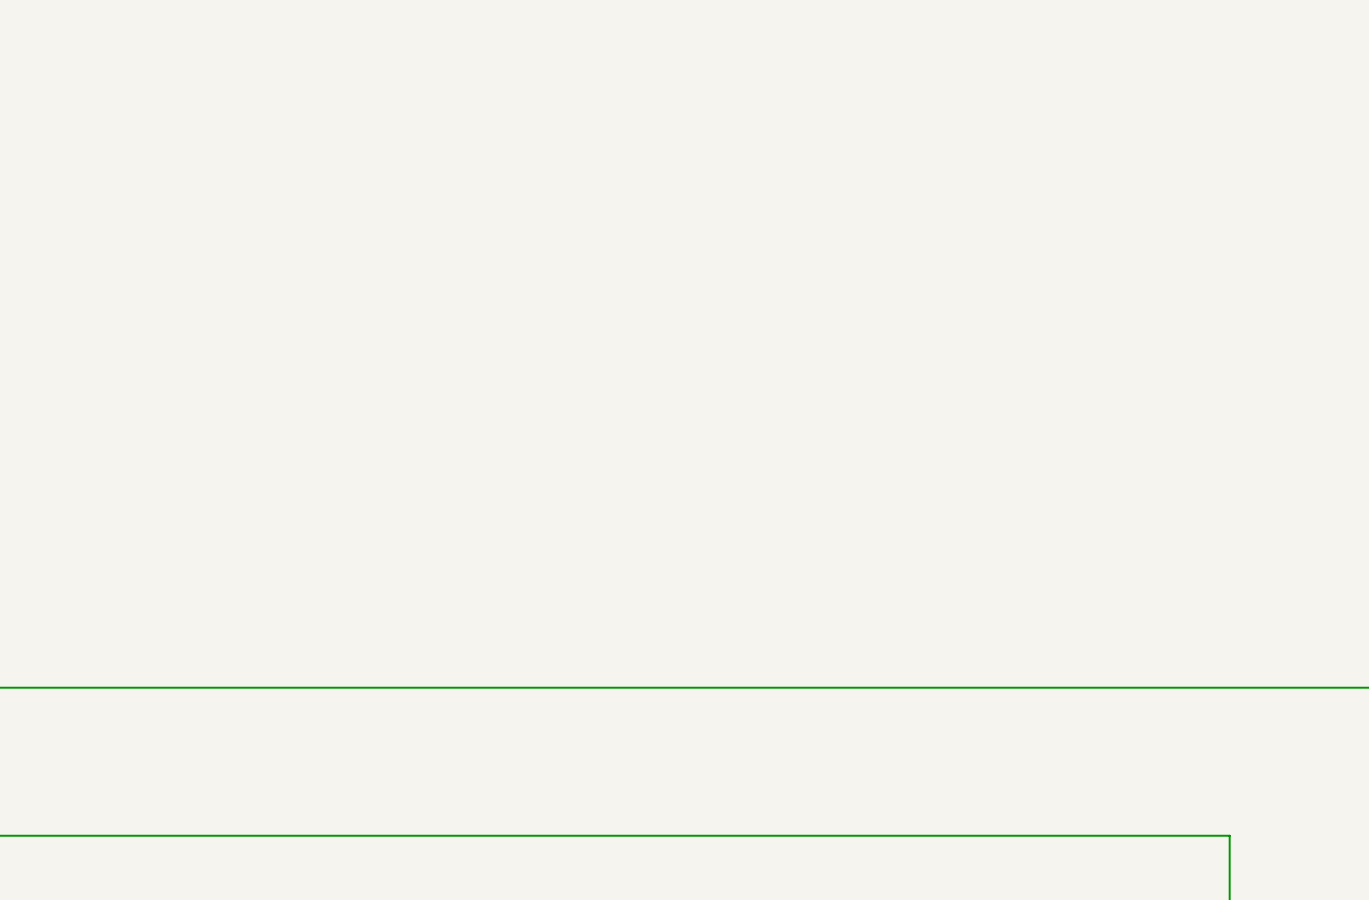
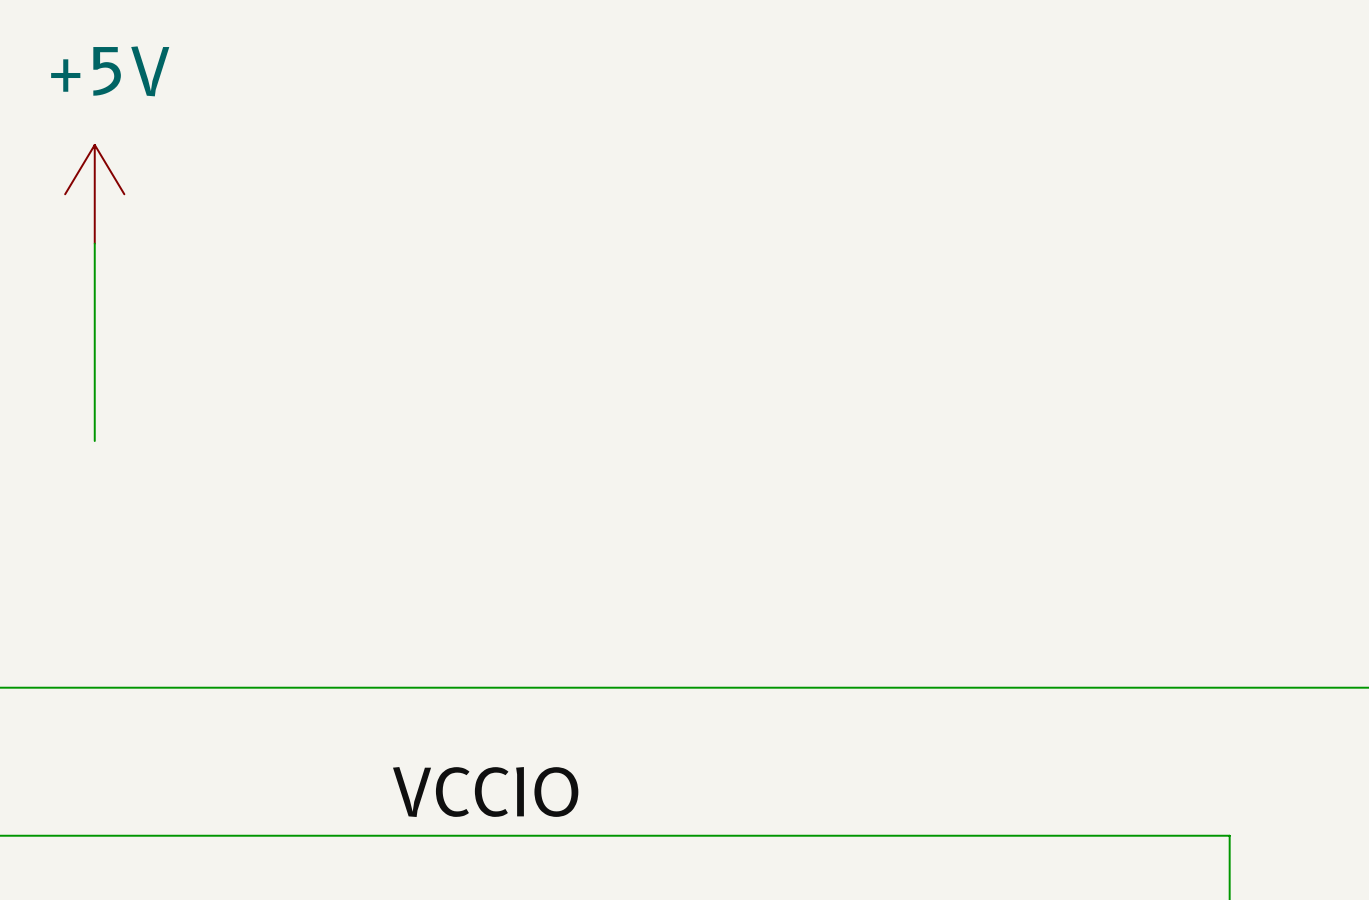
power symbol: none -> +5V (94, 194)
wire: none -> (94, 243) (94, 440)
label: none -> VCCIO (485, 792)

